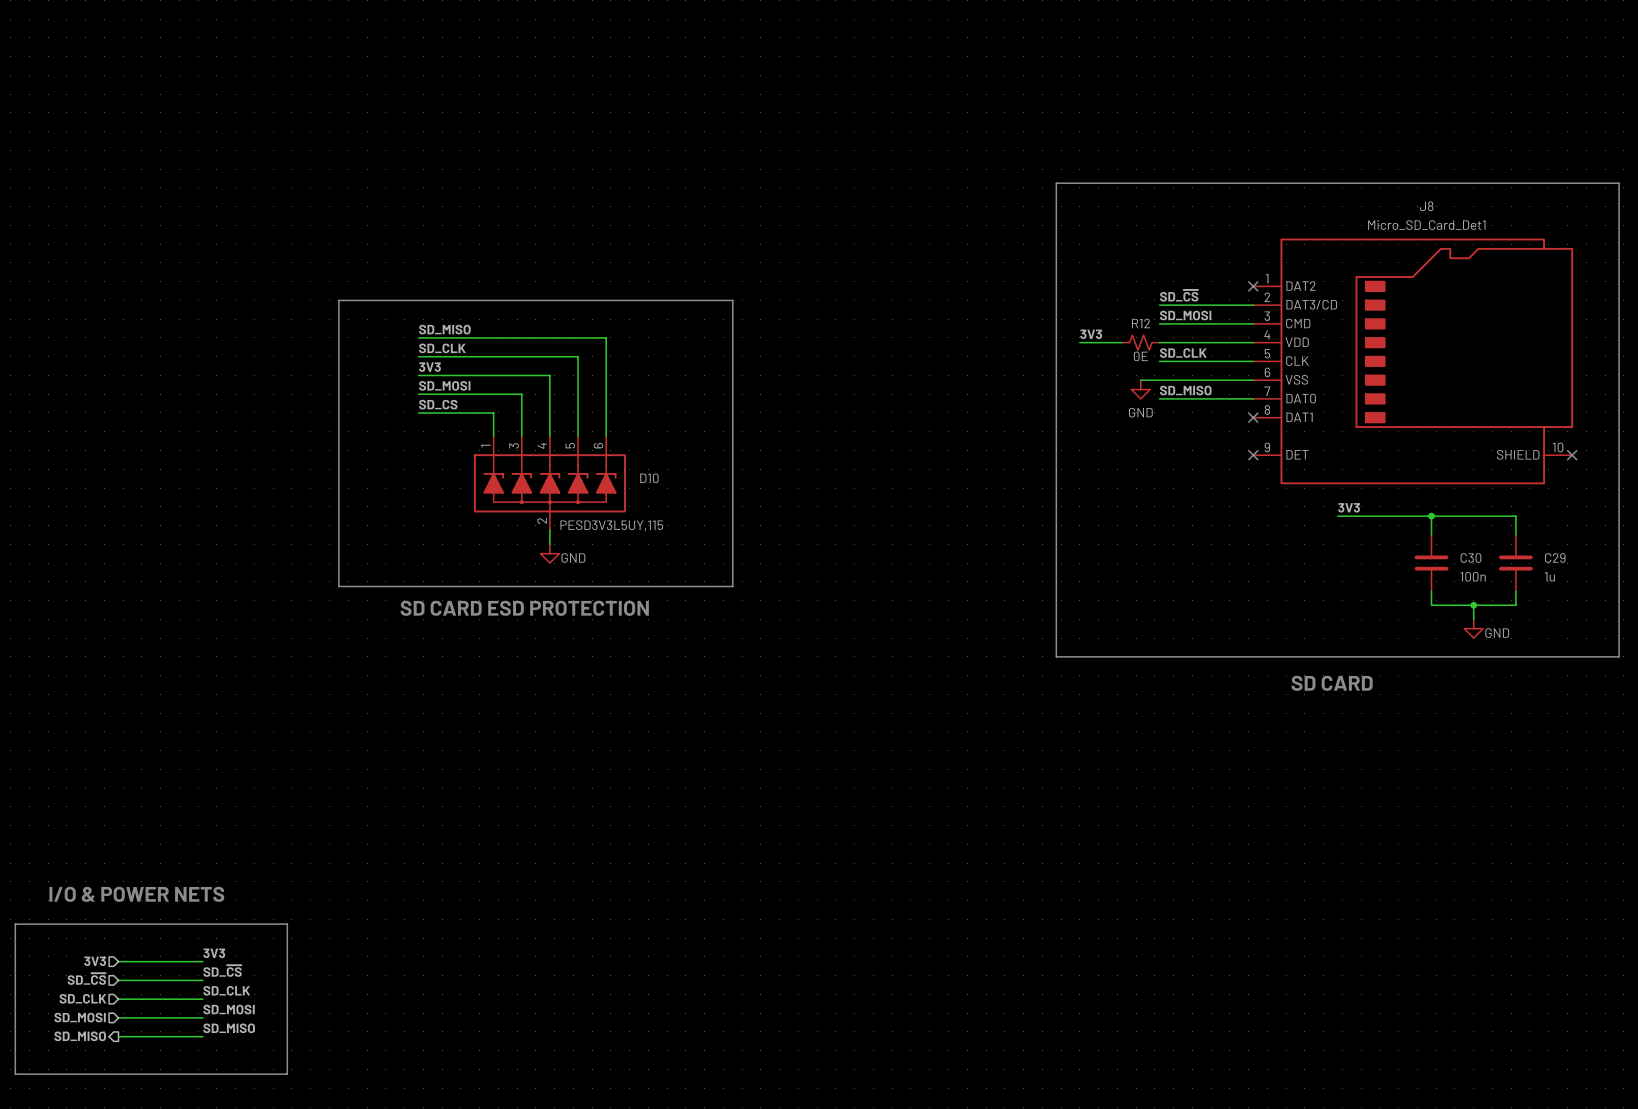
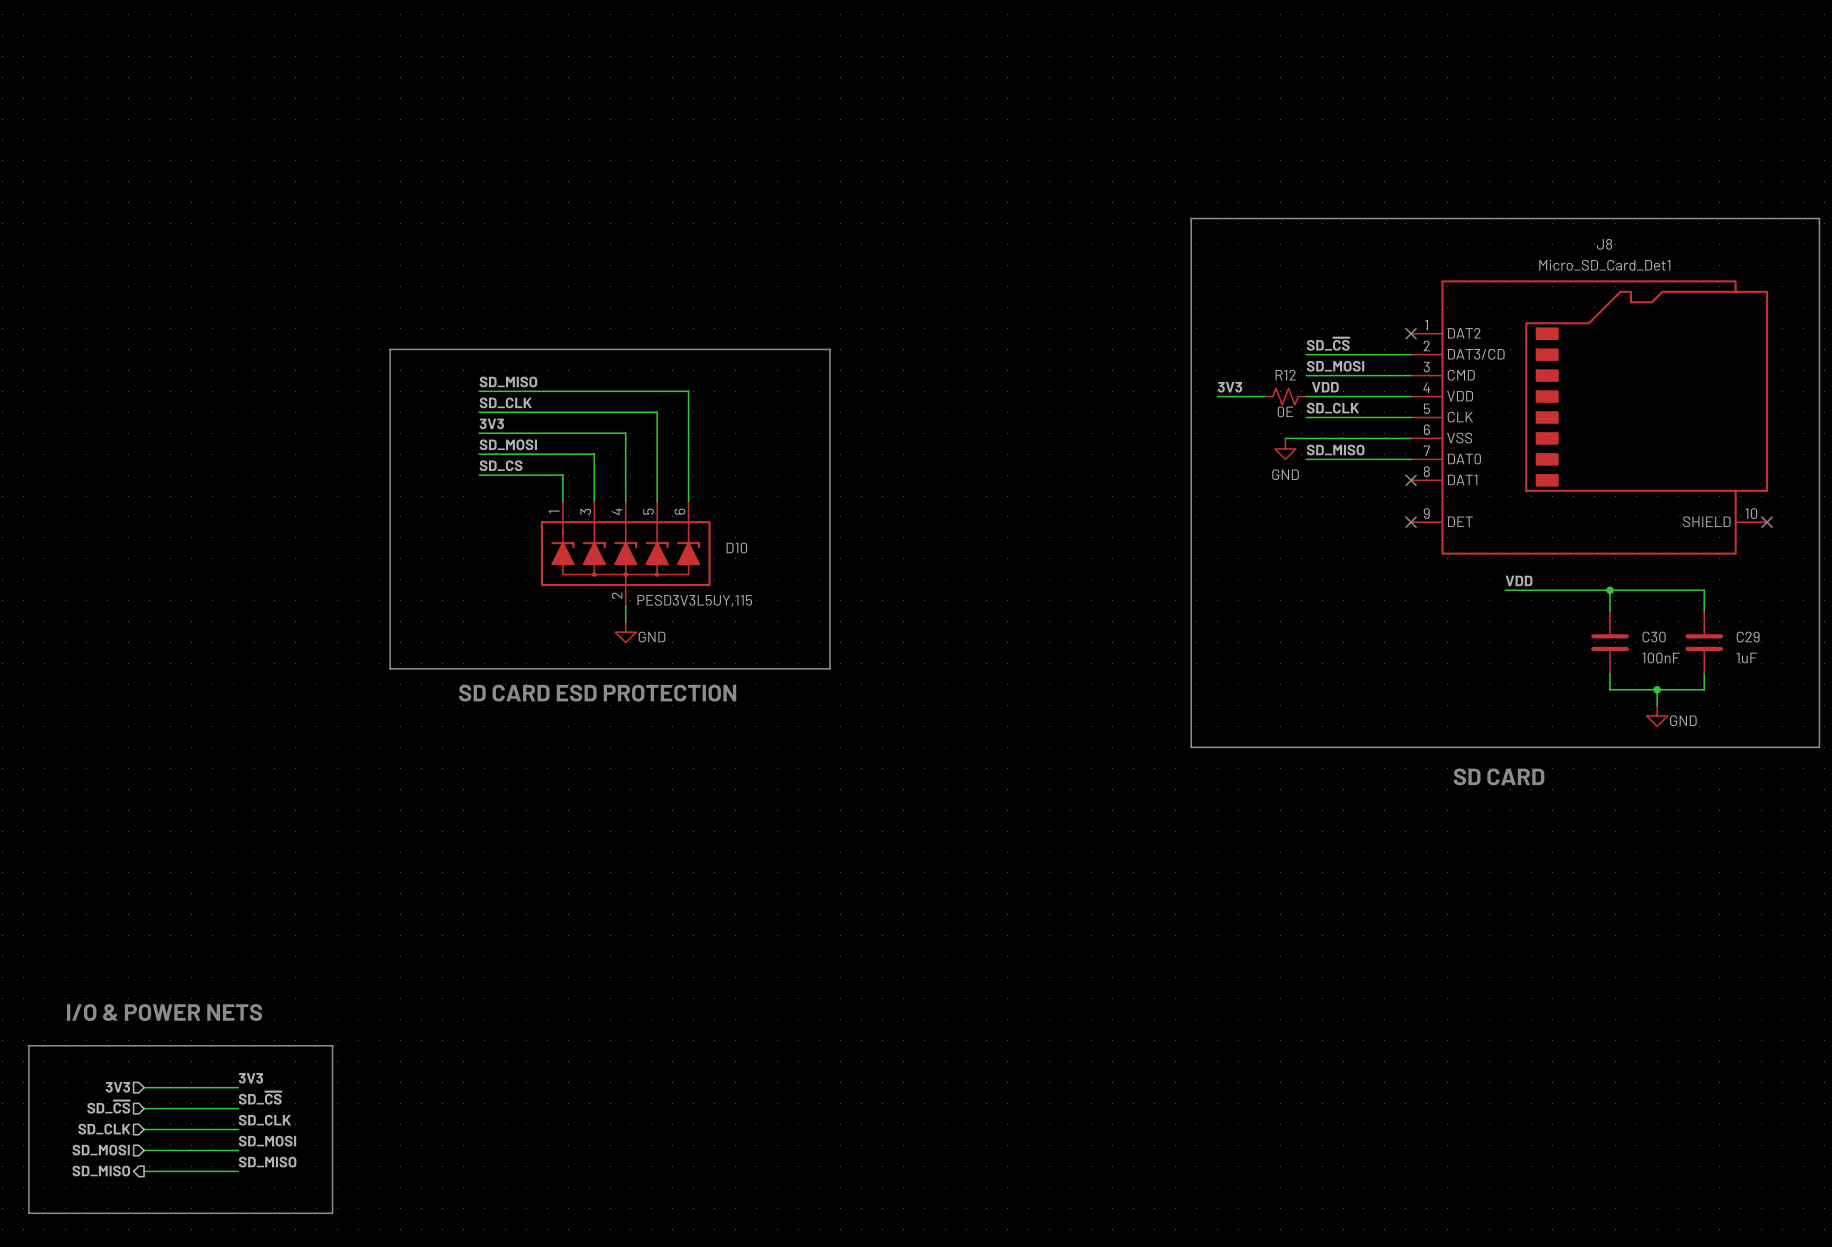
label: none -> VDD (1325, 387)
label: 3V3 (1349, 507) -> VDD (1519, 580)
C30 value: 100n (1473, 576) -> 100nF (1661, 657)
C29 value: 1u (1549, 576) -> 1uF (1746, 657)

